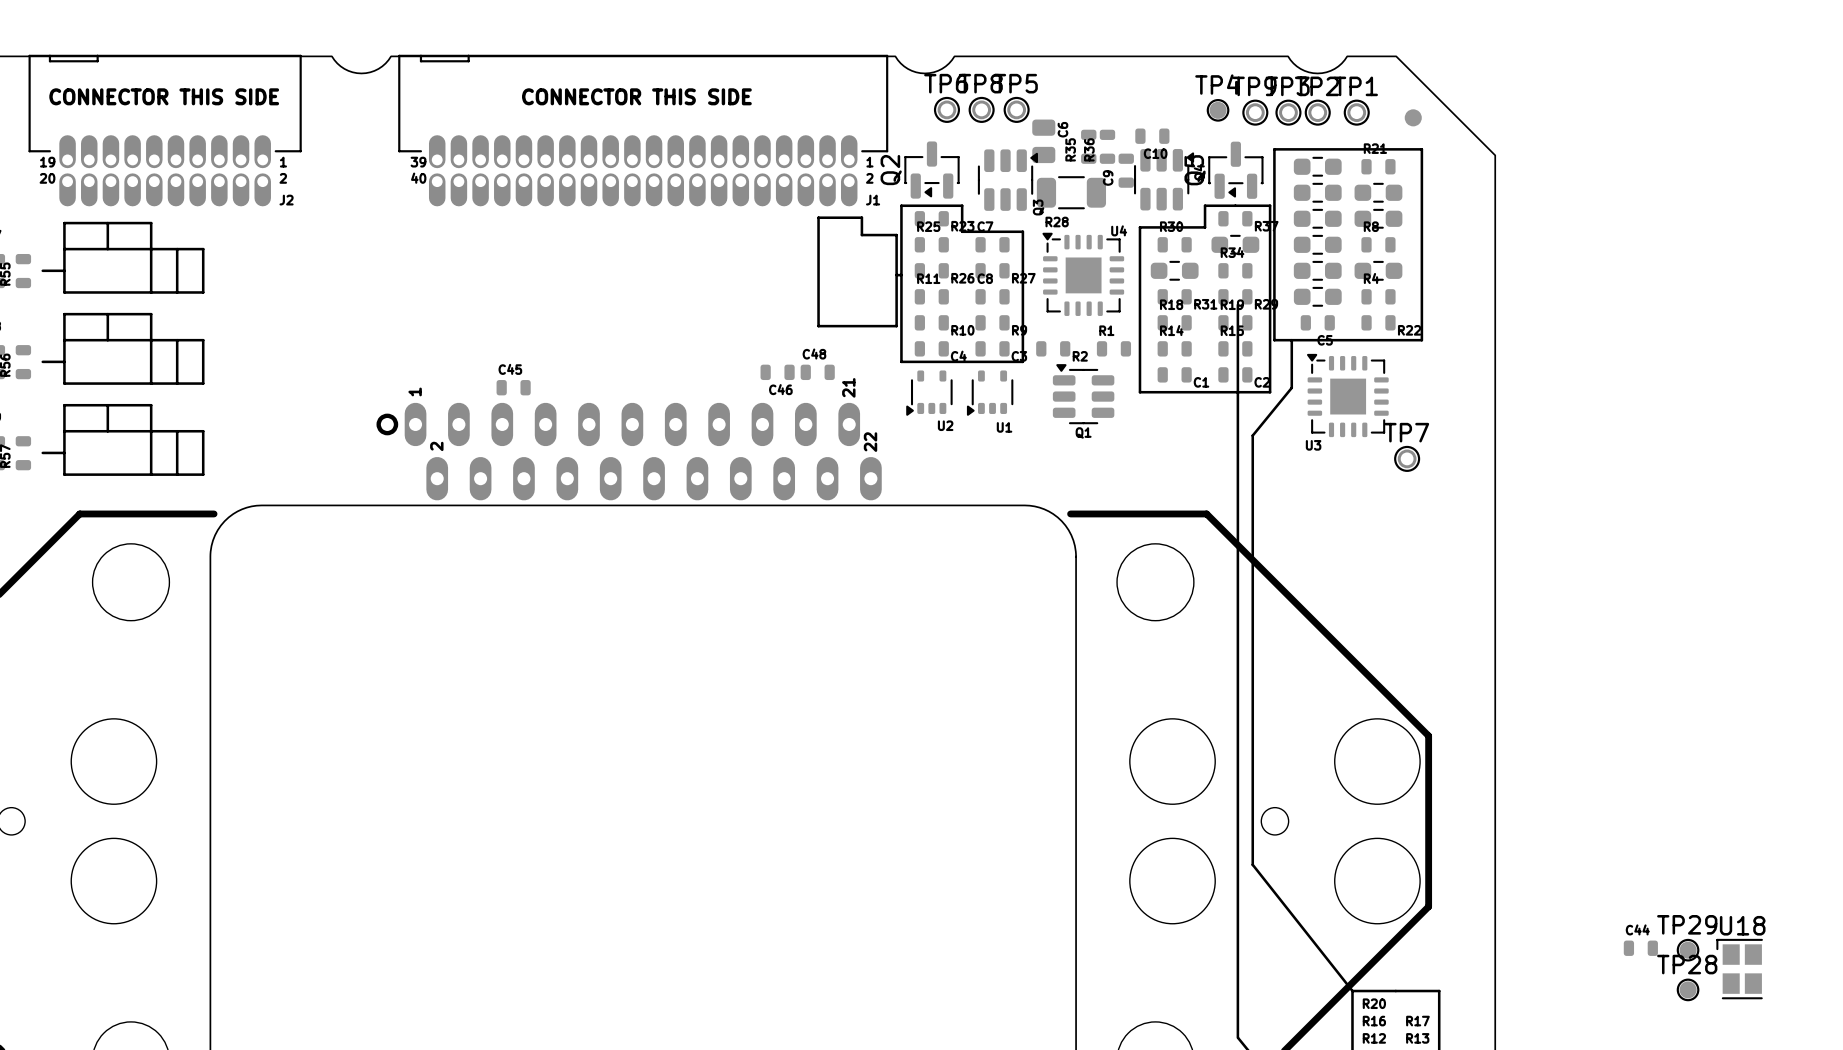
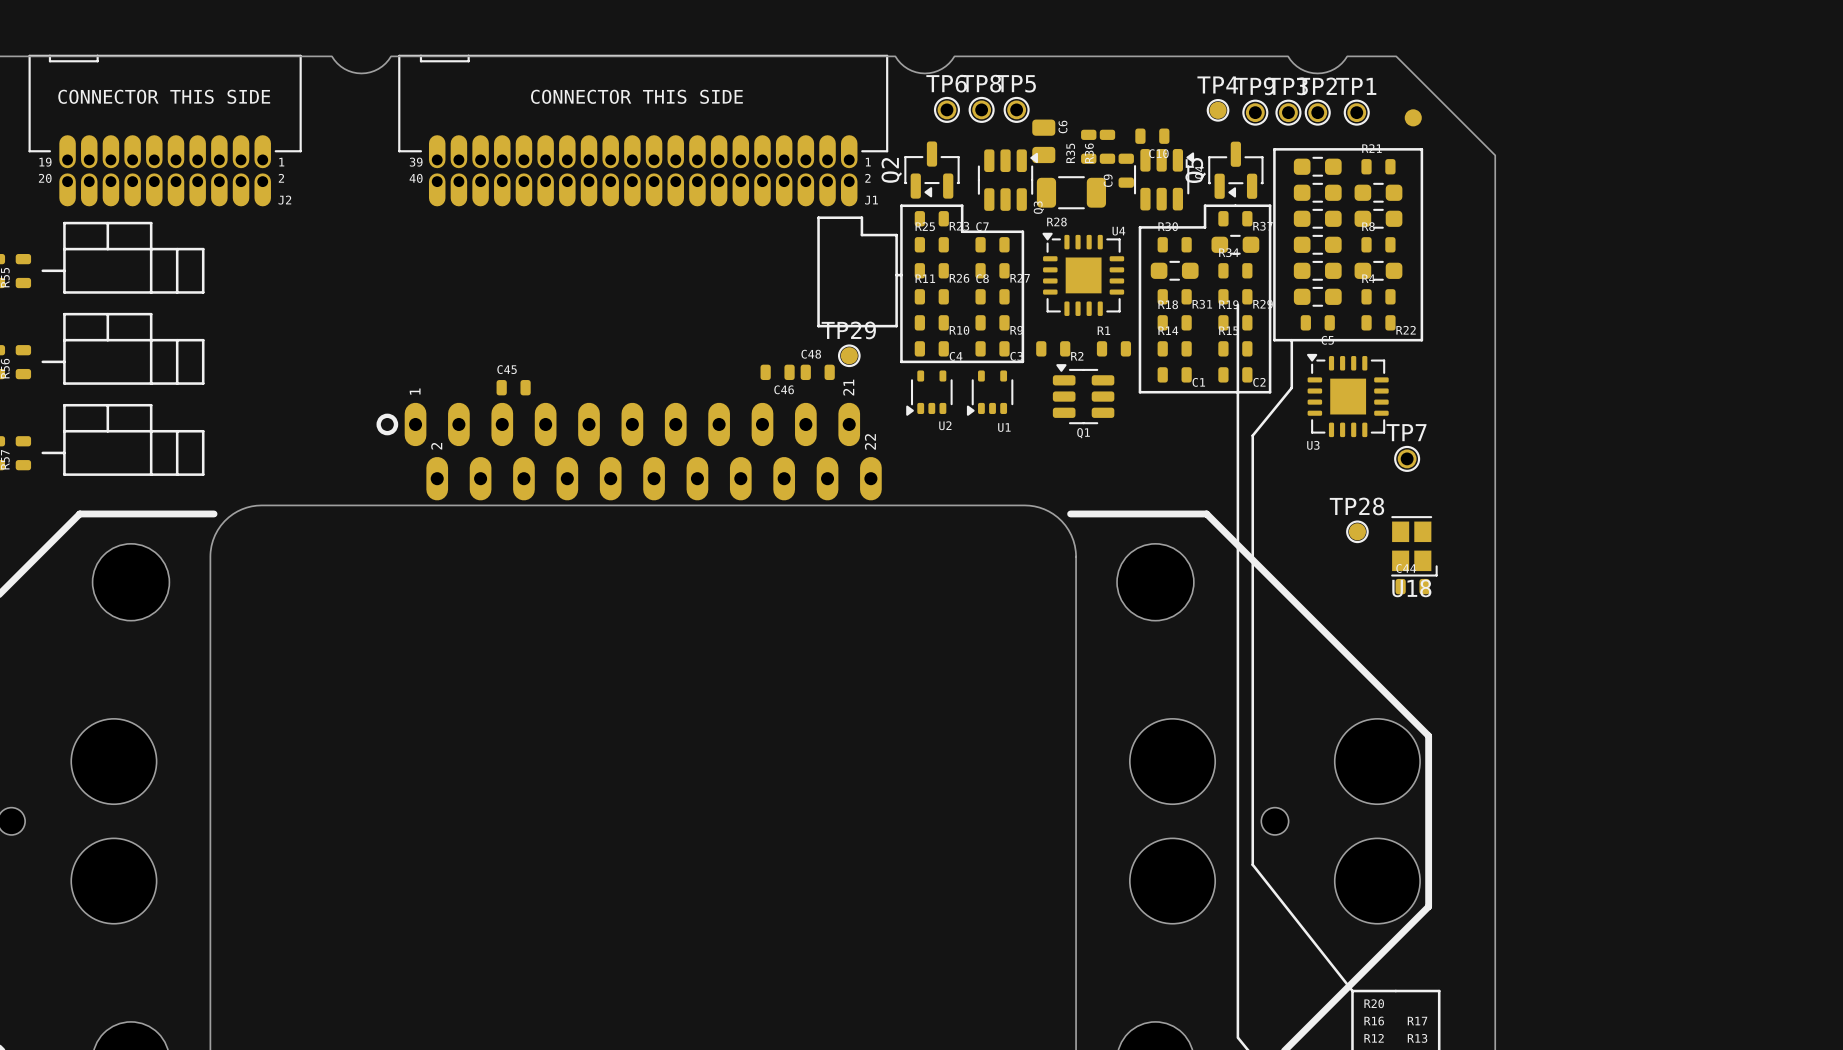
C44 position: (1640, 948) -> (1412, 586)
TP29 position: (1688, 950) -> (849, 355)
U18 rotation: 0° (1739, 969) -> 180° (1414, 546)
U18 position: (1739, 969) -> (1414, 546)
TP28 position: (1688, 989) -> (1357, 531)

